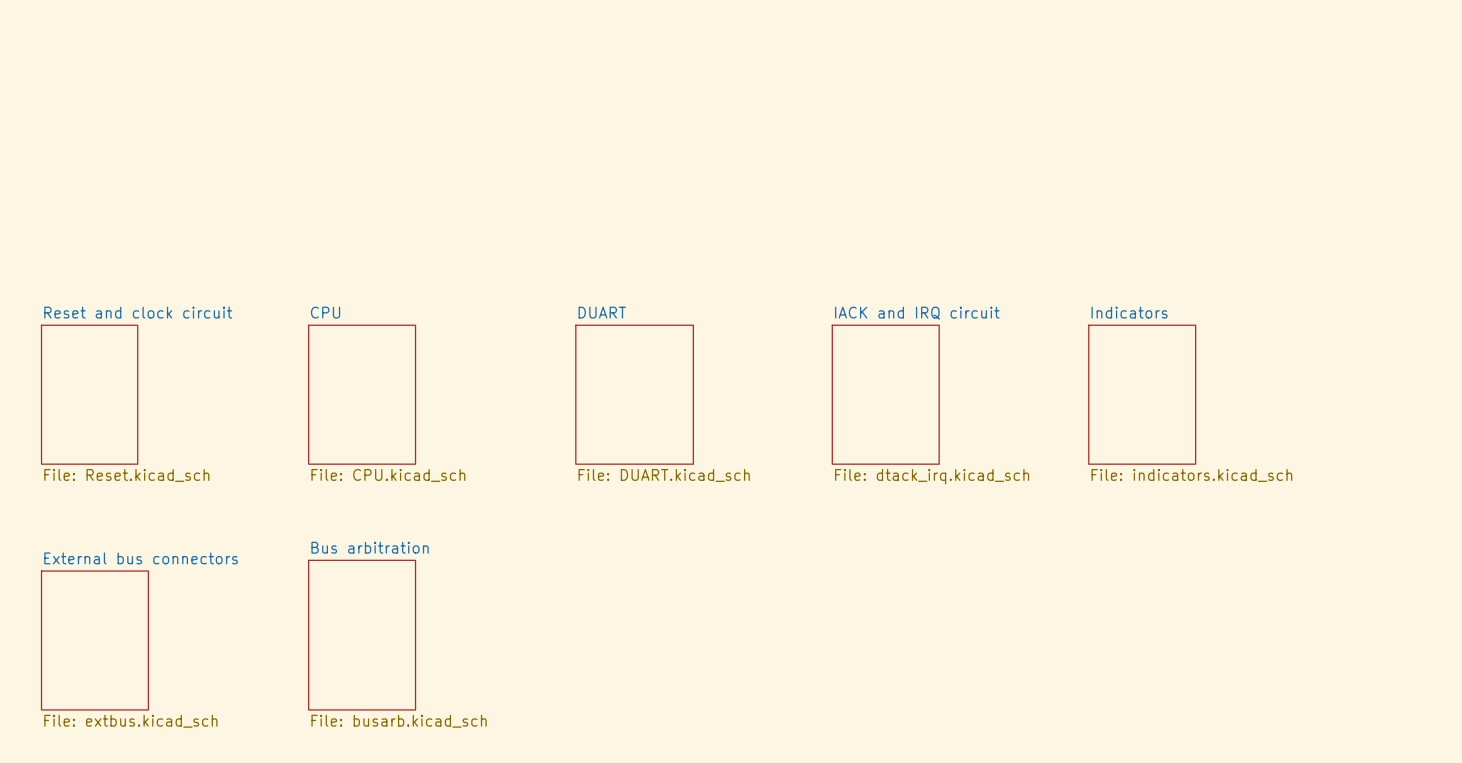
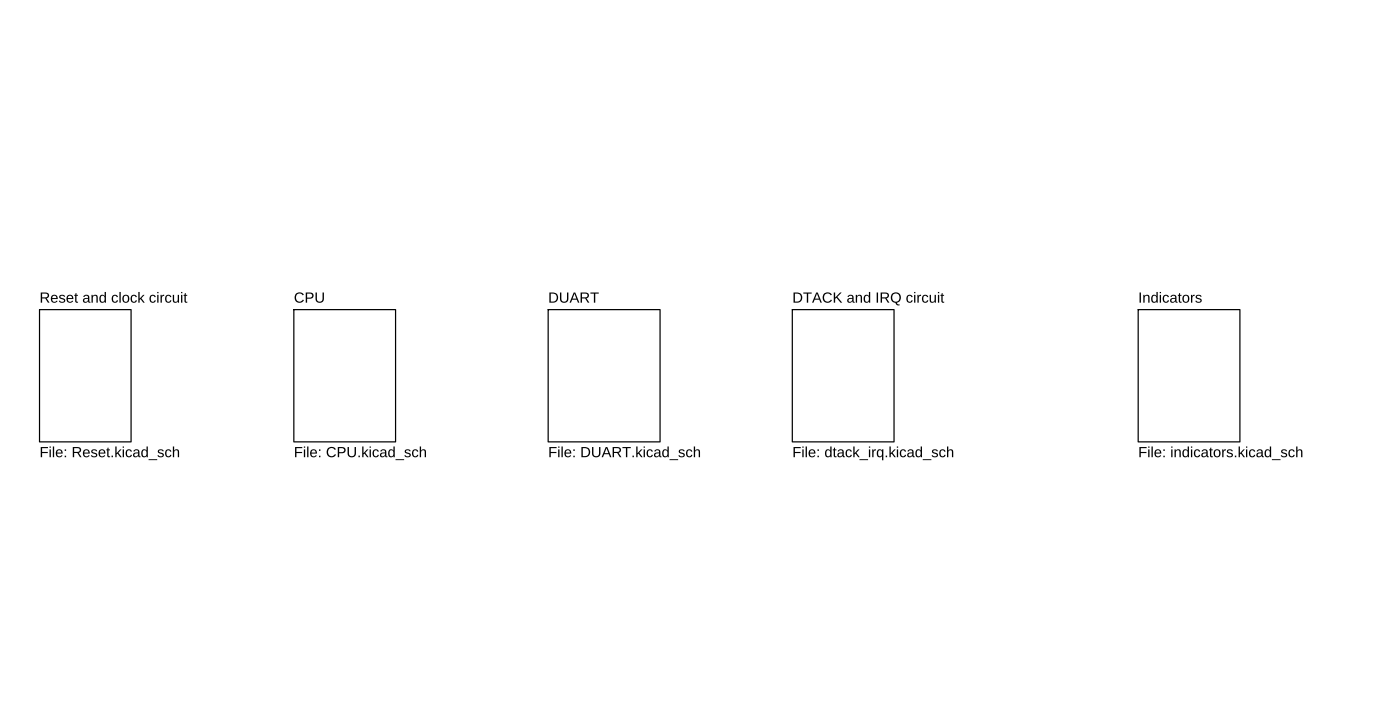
sheet IACK and IRQ circuit name: IACK and IRQ circuit (917, 313) -> DTACK and IRQ circuit (868, 298)
sheet Indicators position: (1142, 394) -> (1189, 375)
sheet Bus arbitration: File: busarb.kicad_sch (362, 635) -> none
sheet External bus connectors: File: extbus.kicad_sch (94, 640) -> none

